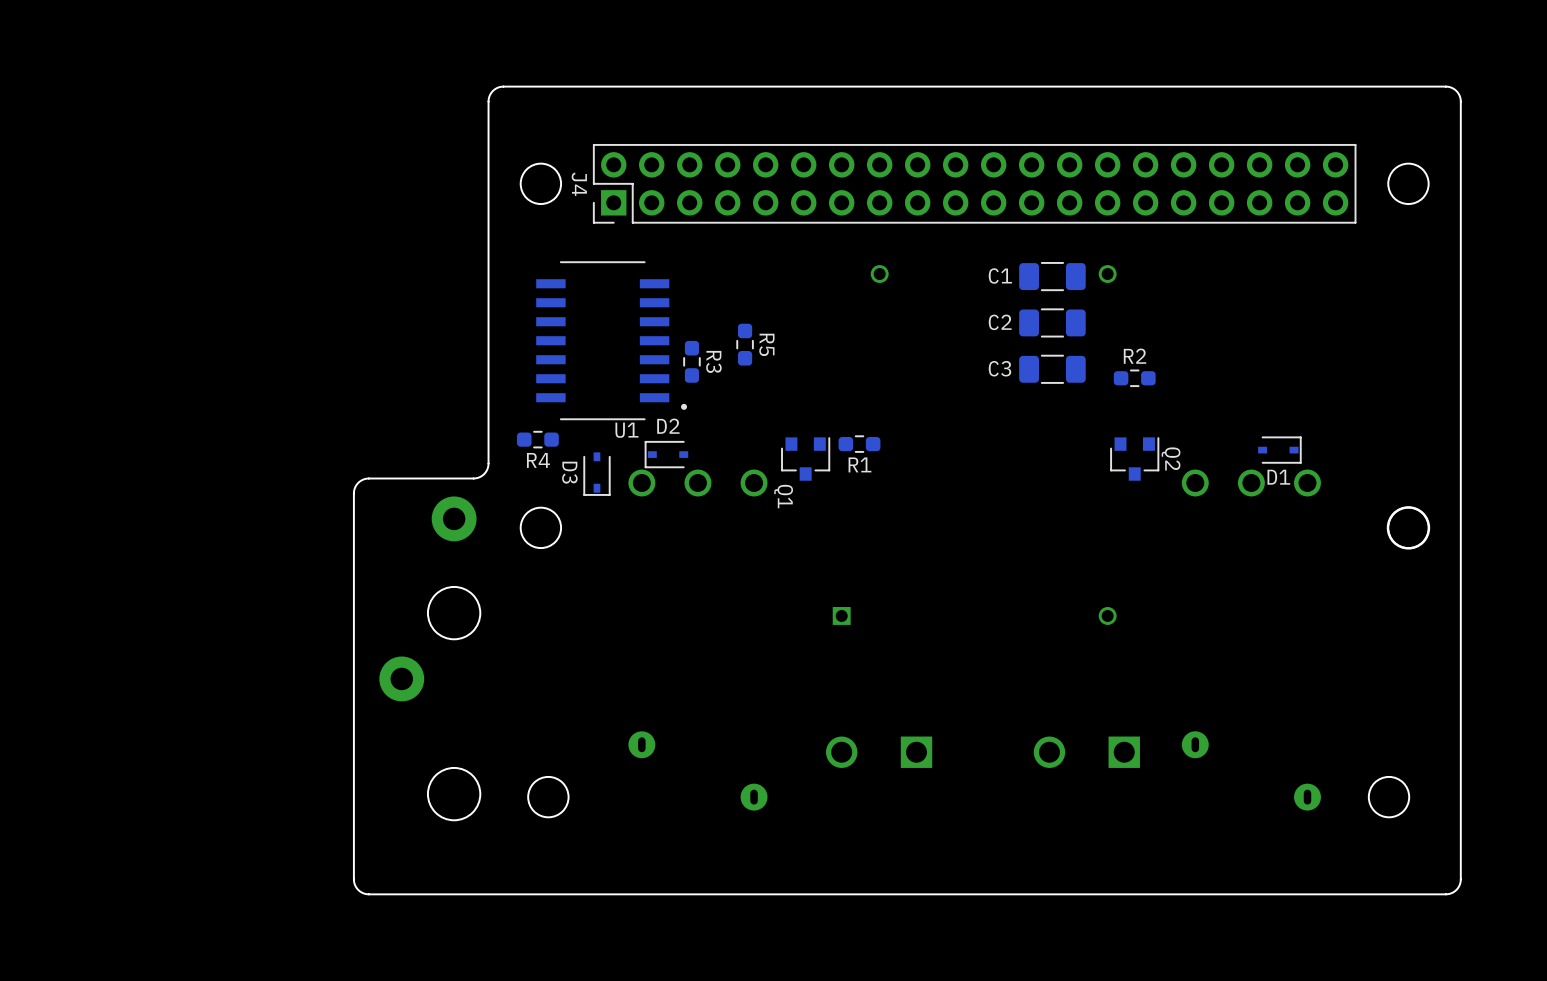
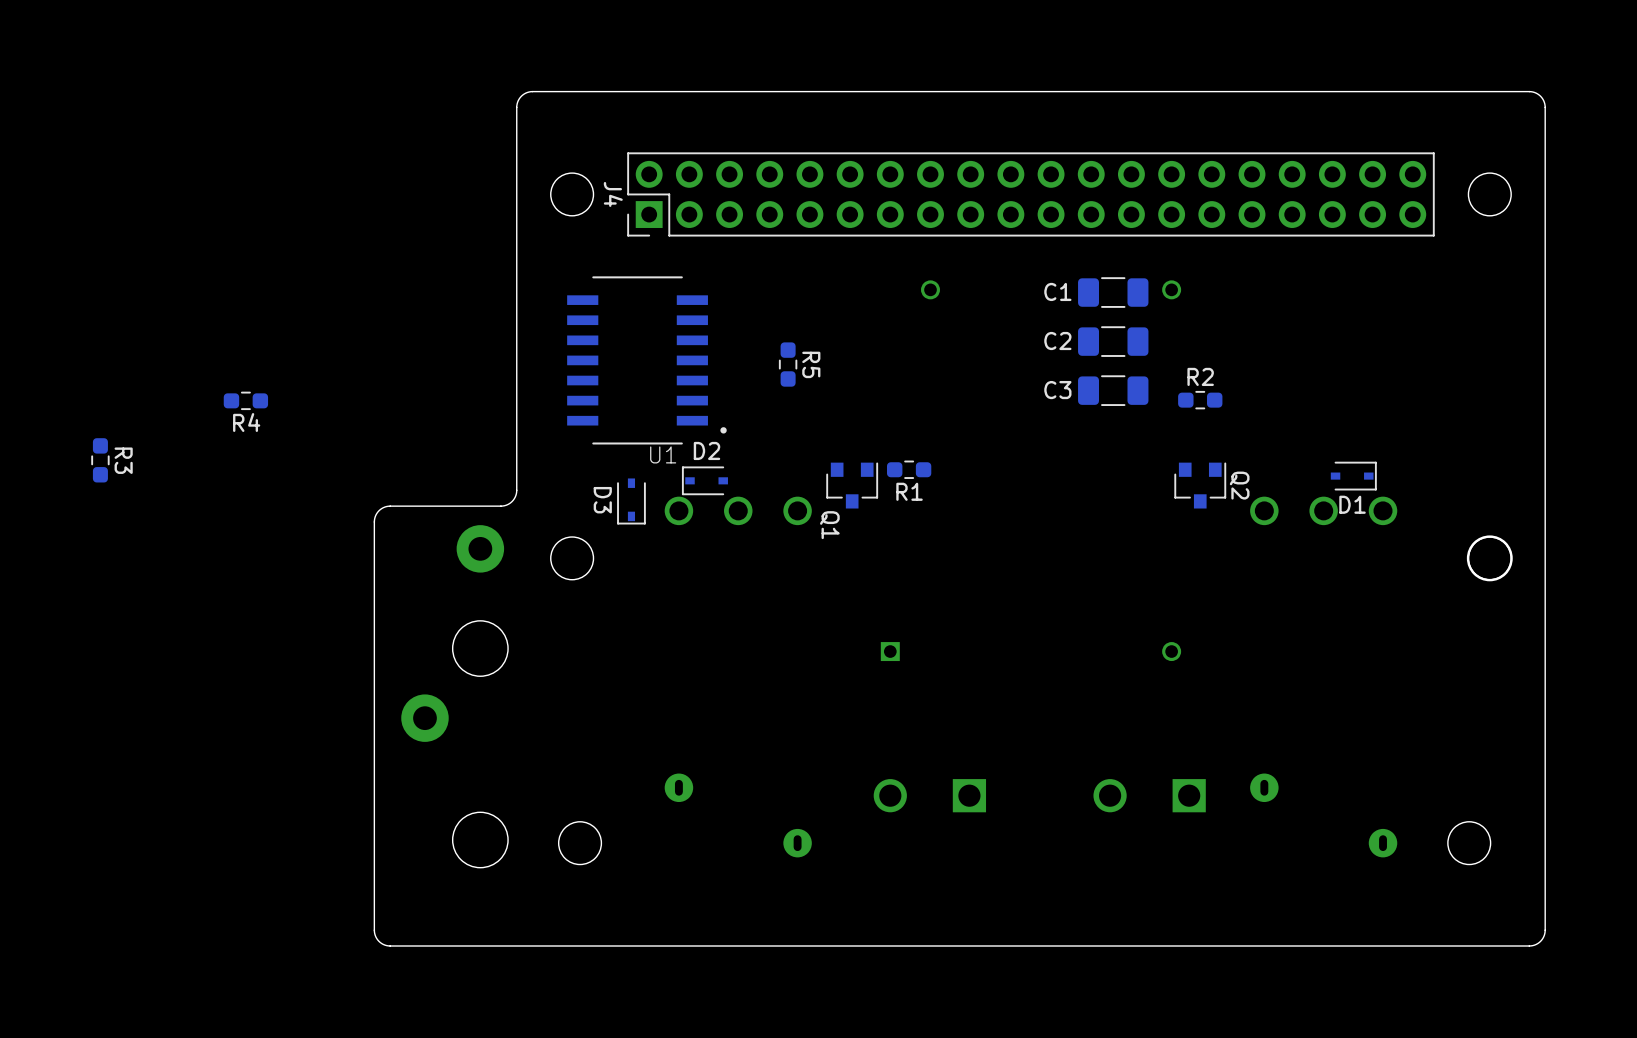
R3 position: (691, 361) -> (100, 460)
R4 position: (537, 439) -> (245, 400)

